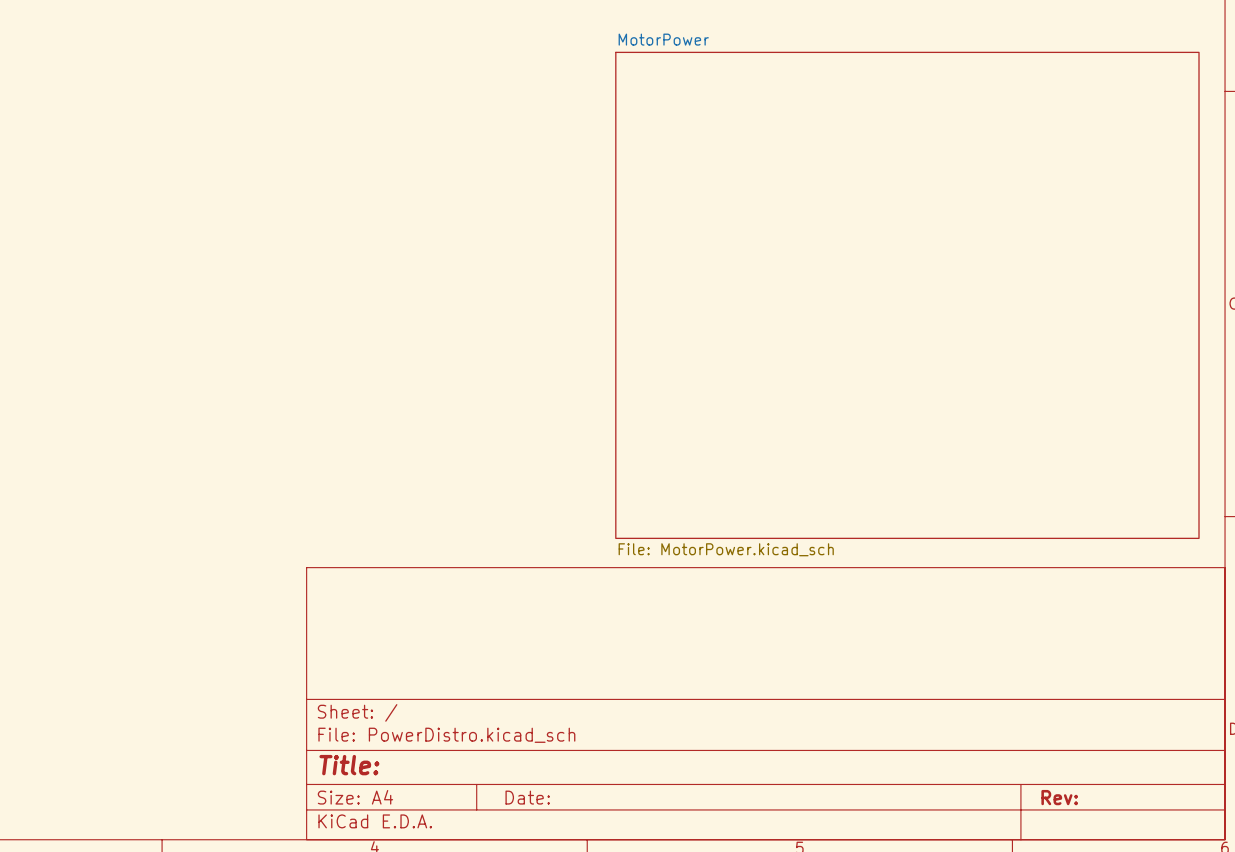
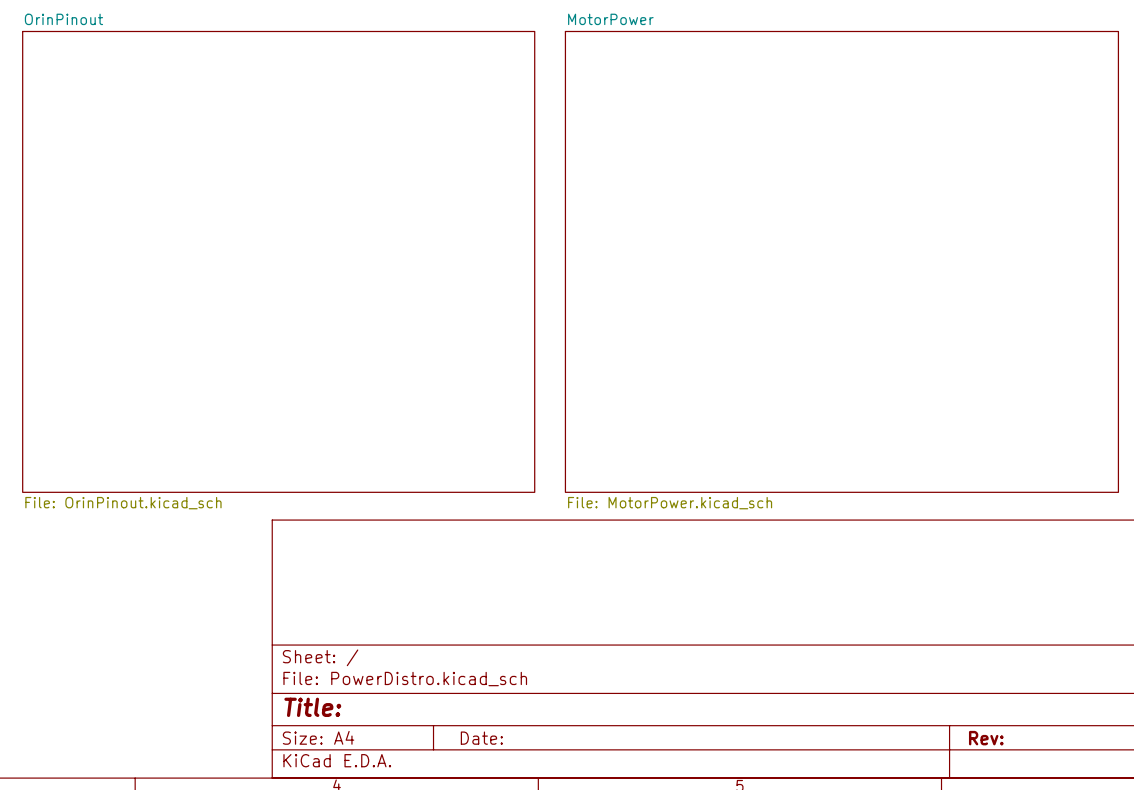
sheet OrinPinout: none -> File: OrinPinout.kicad_sch (278, 261)

